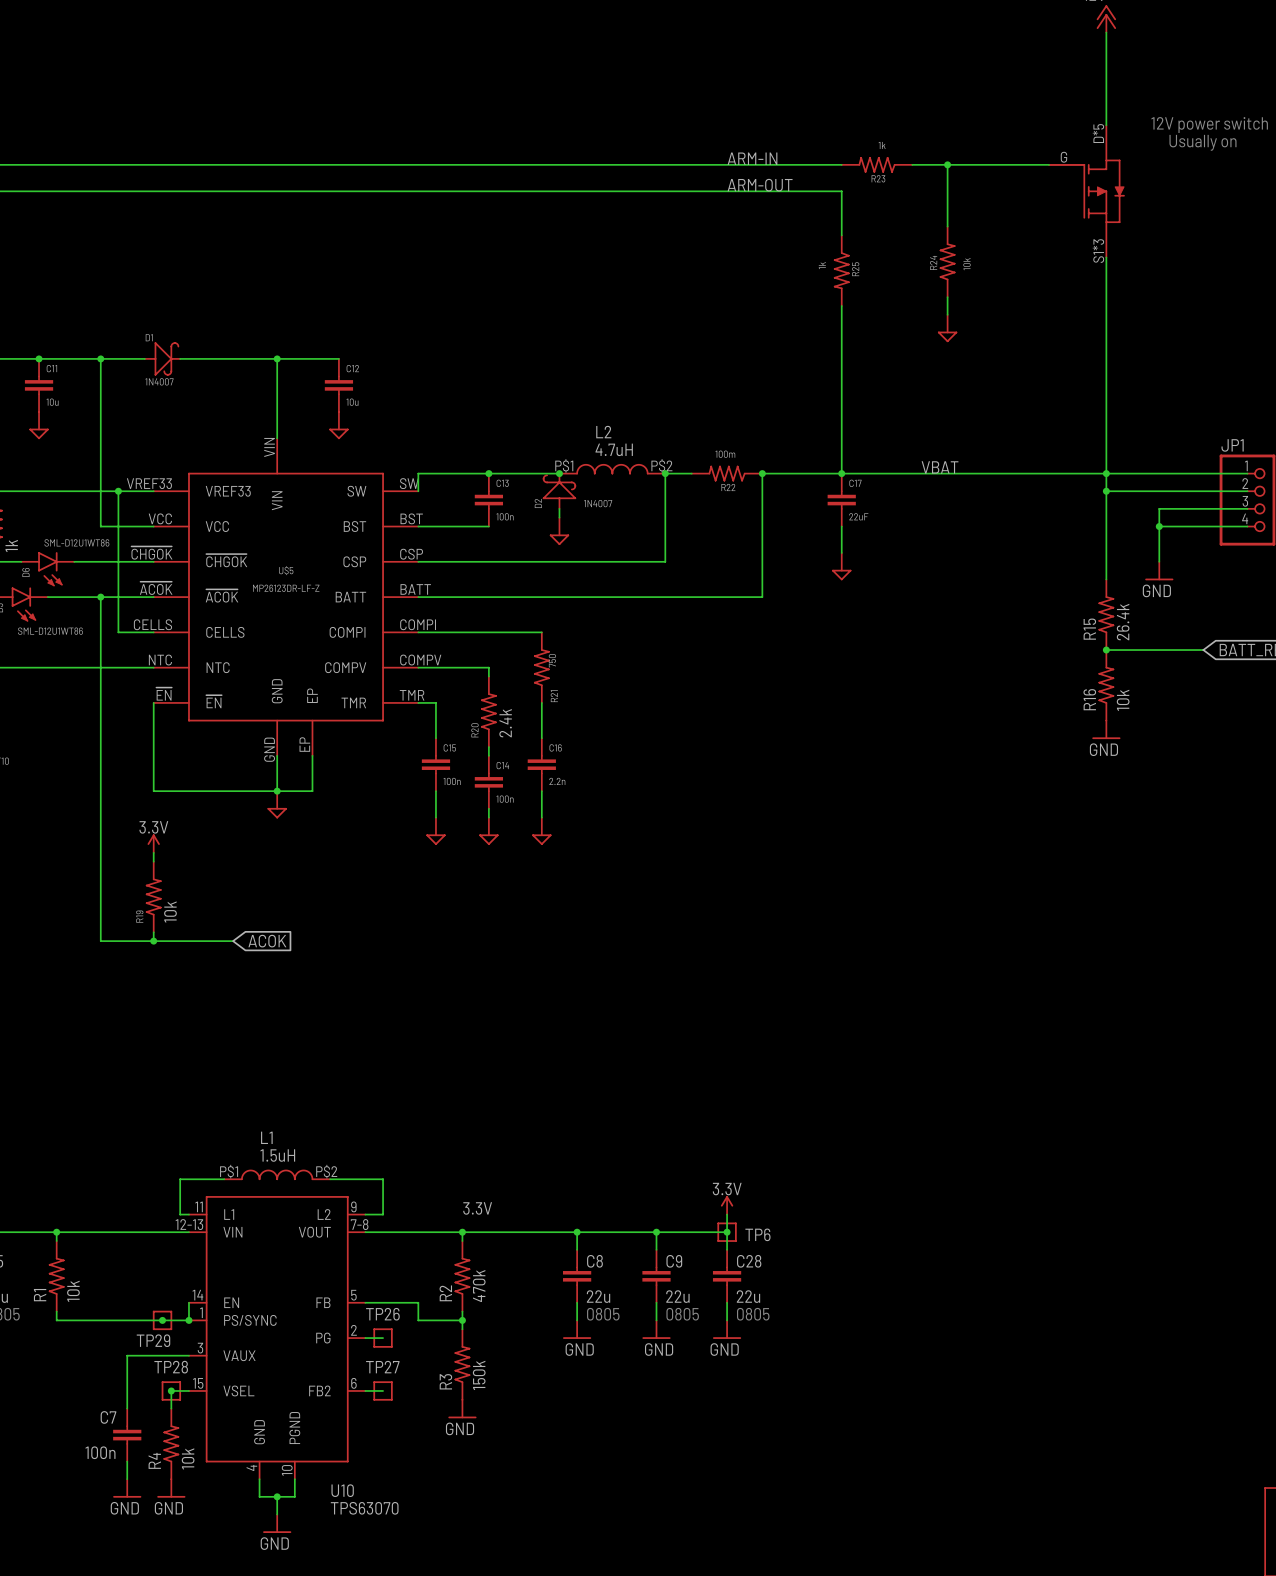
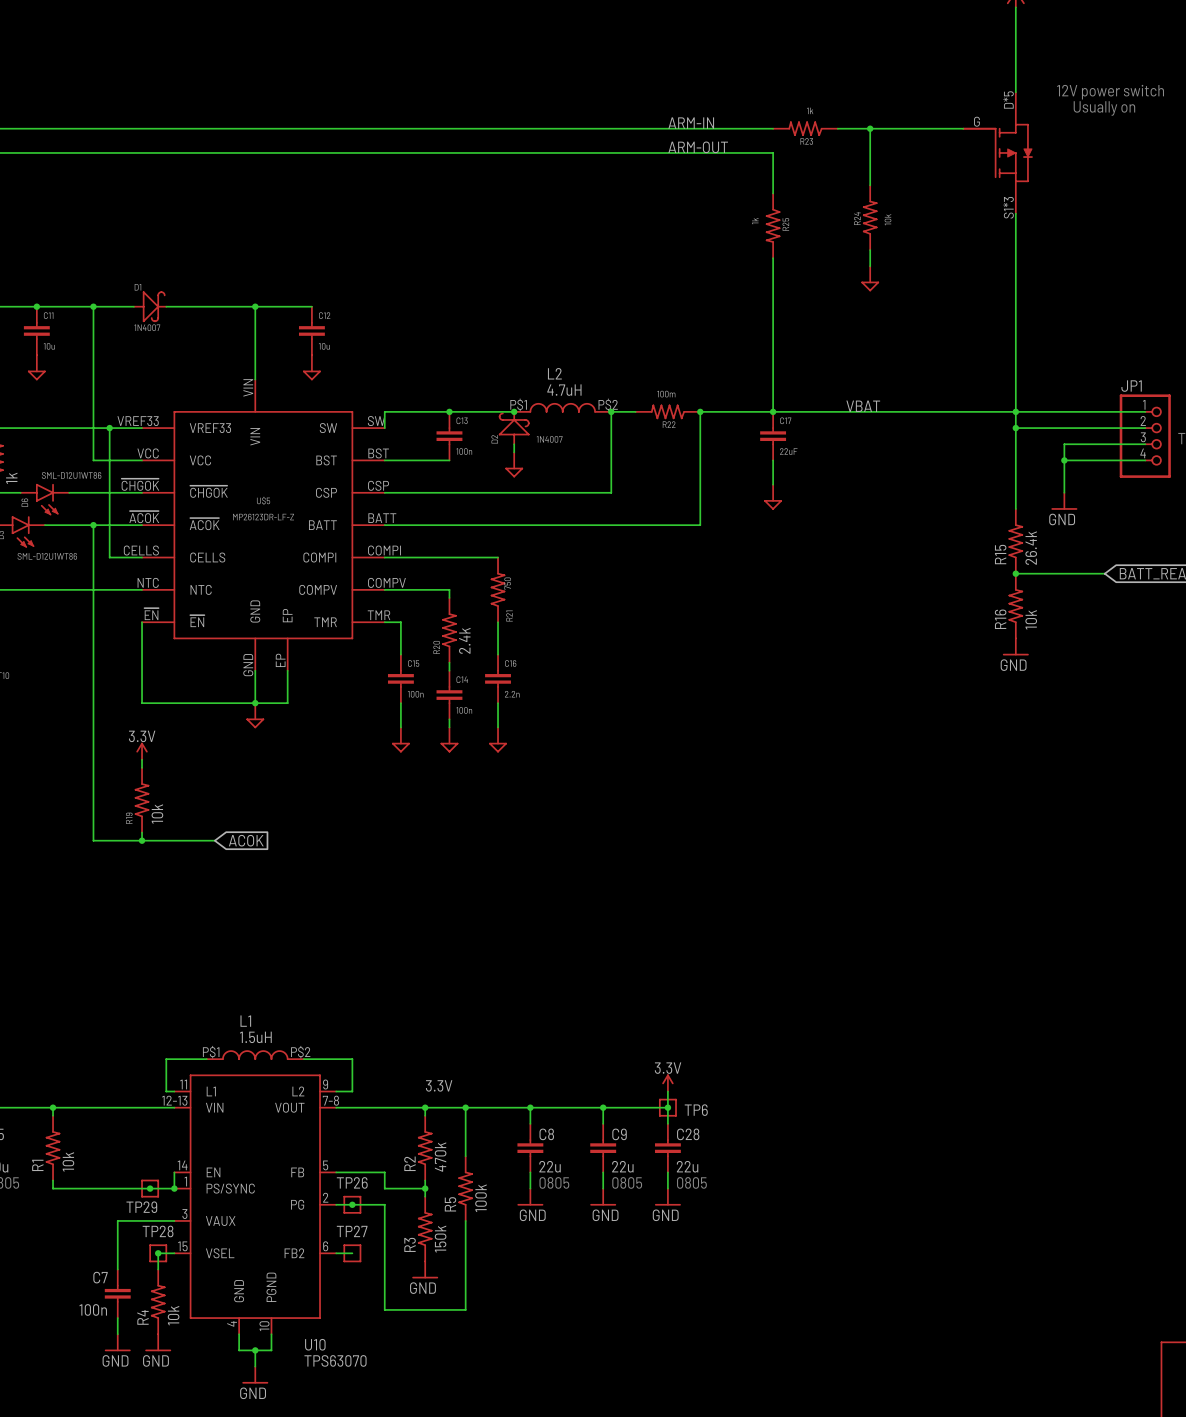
wire: none -> (465, 1107) (465, 1156)
junction: none -> (465, 1107)
R5: none -> 100k (465, 1188)
wire: none -> (352, 1204) (384, 1204) (384, 1309) (465, 1309) (465, 1220)
junction: none -> (352, 1204)

